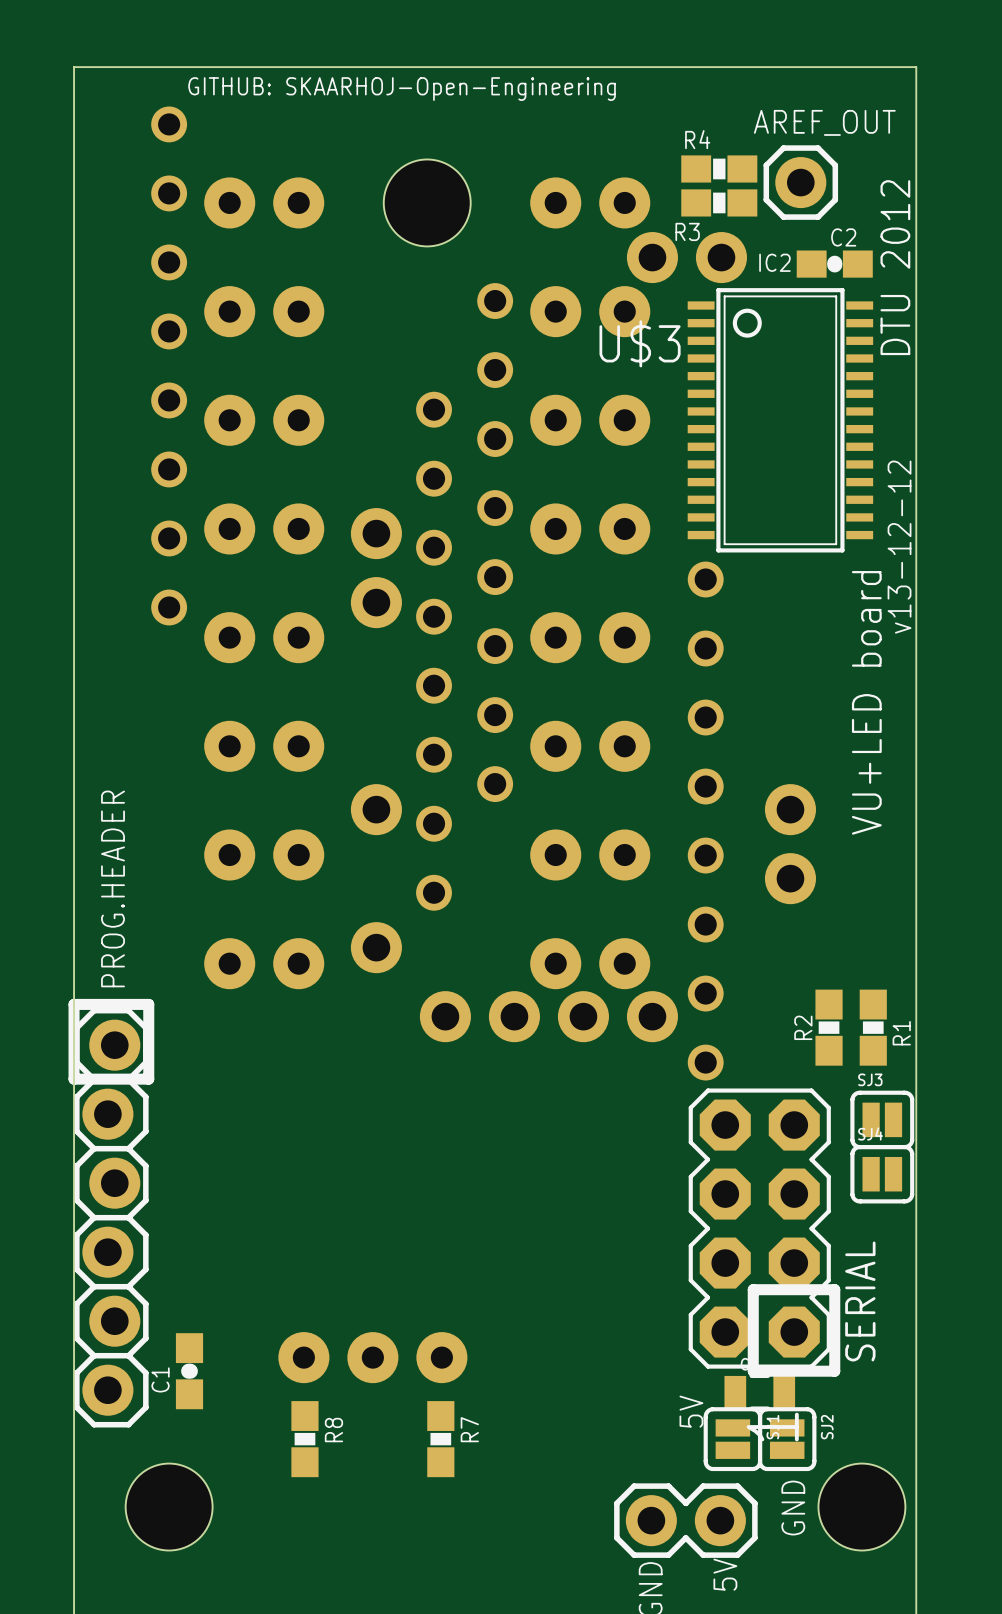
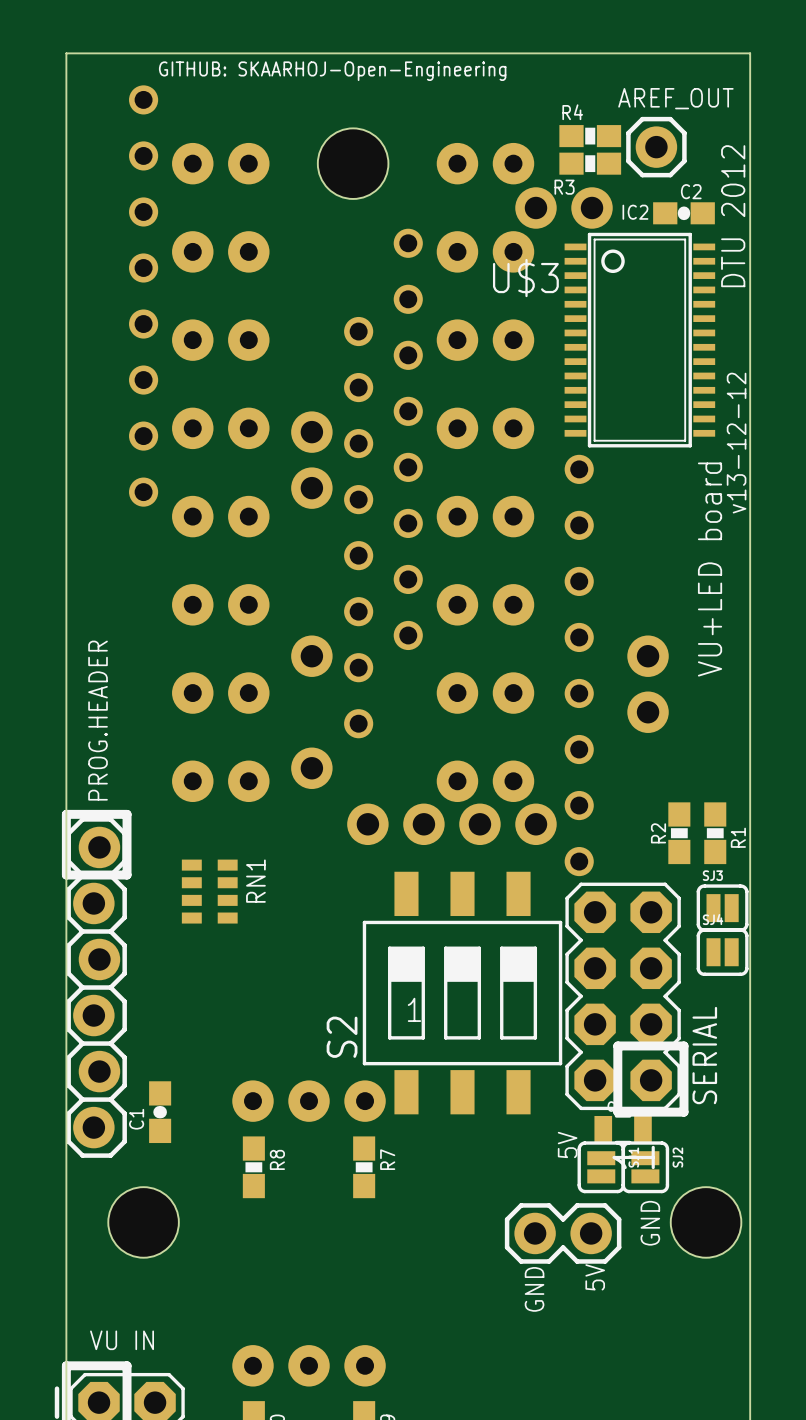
RN1: none -> (209, 891)
S2: none -> (462, 993)

